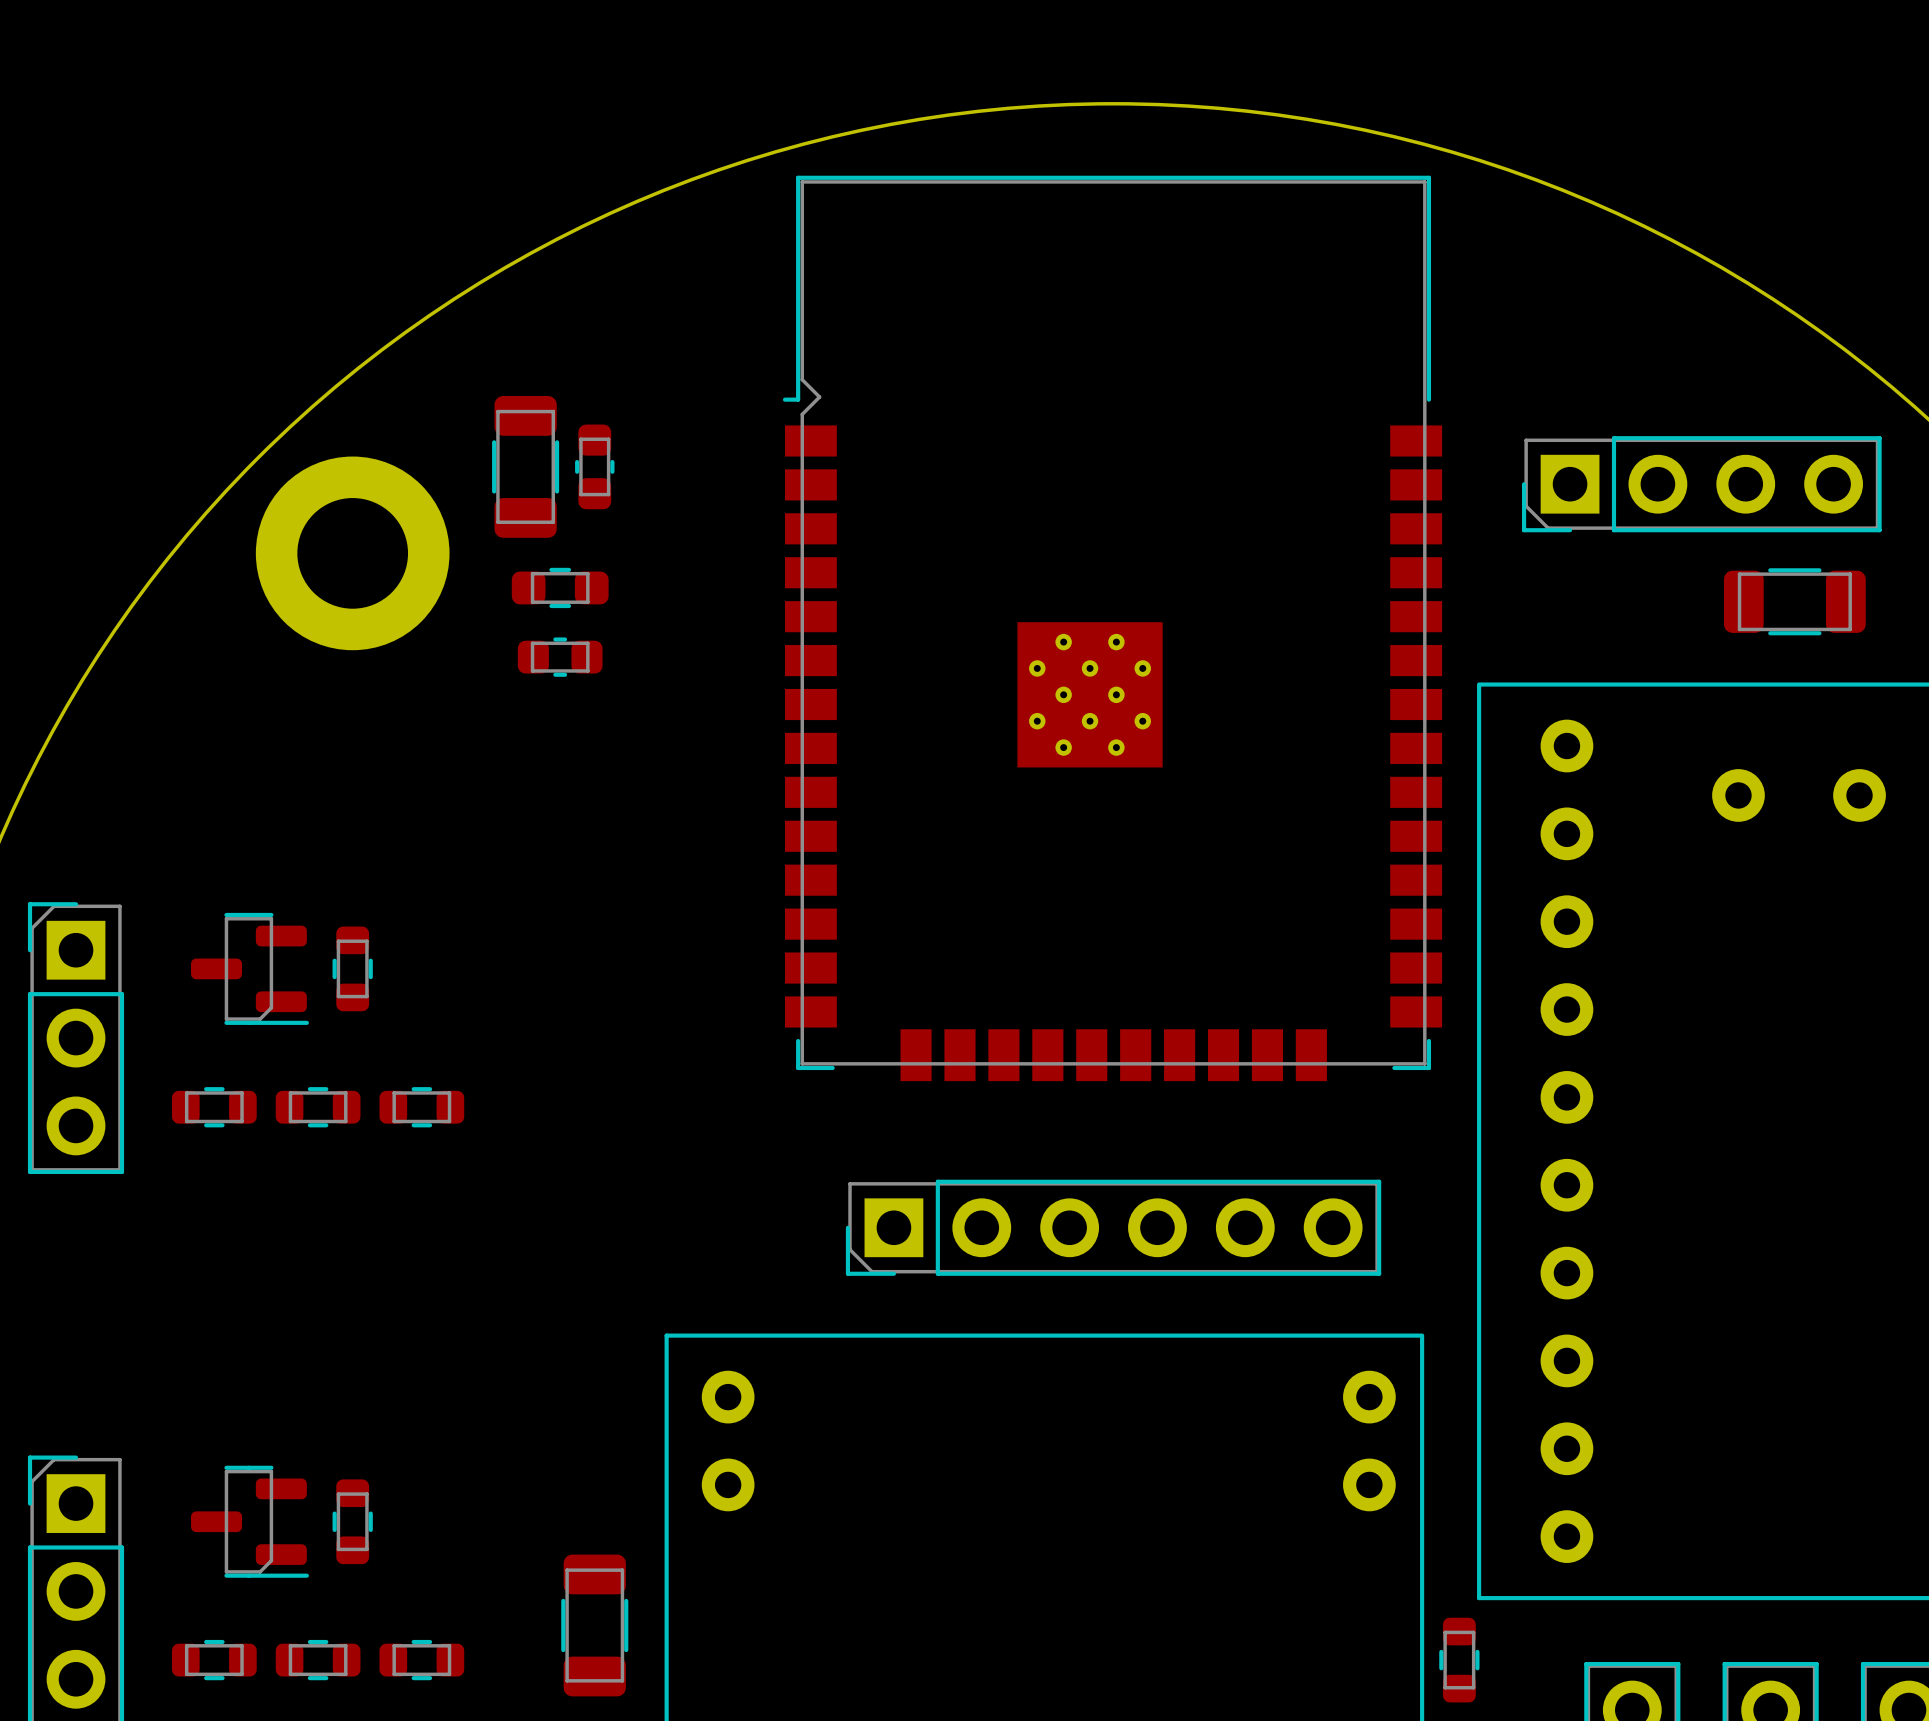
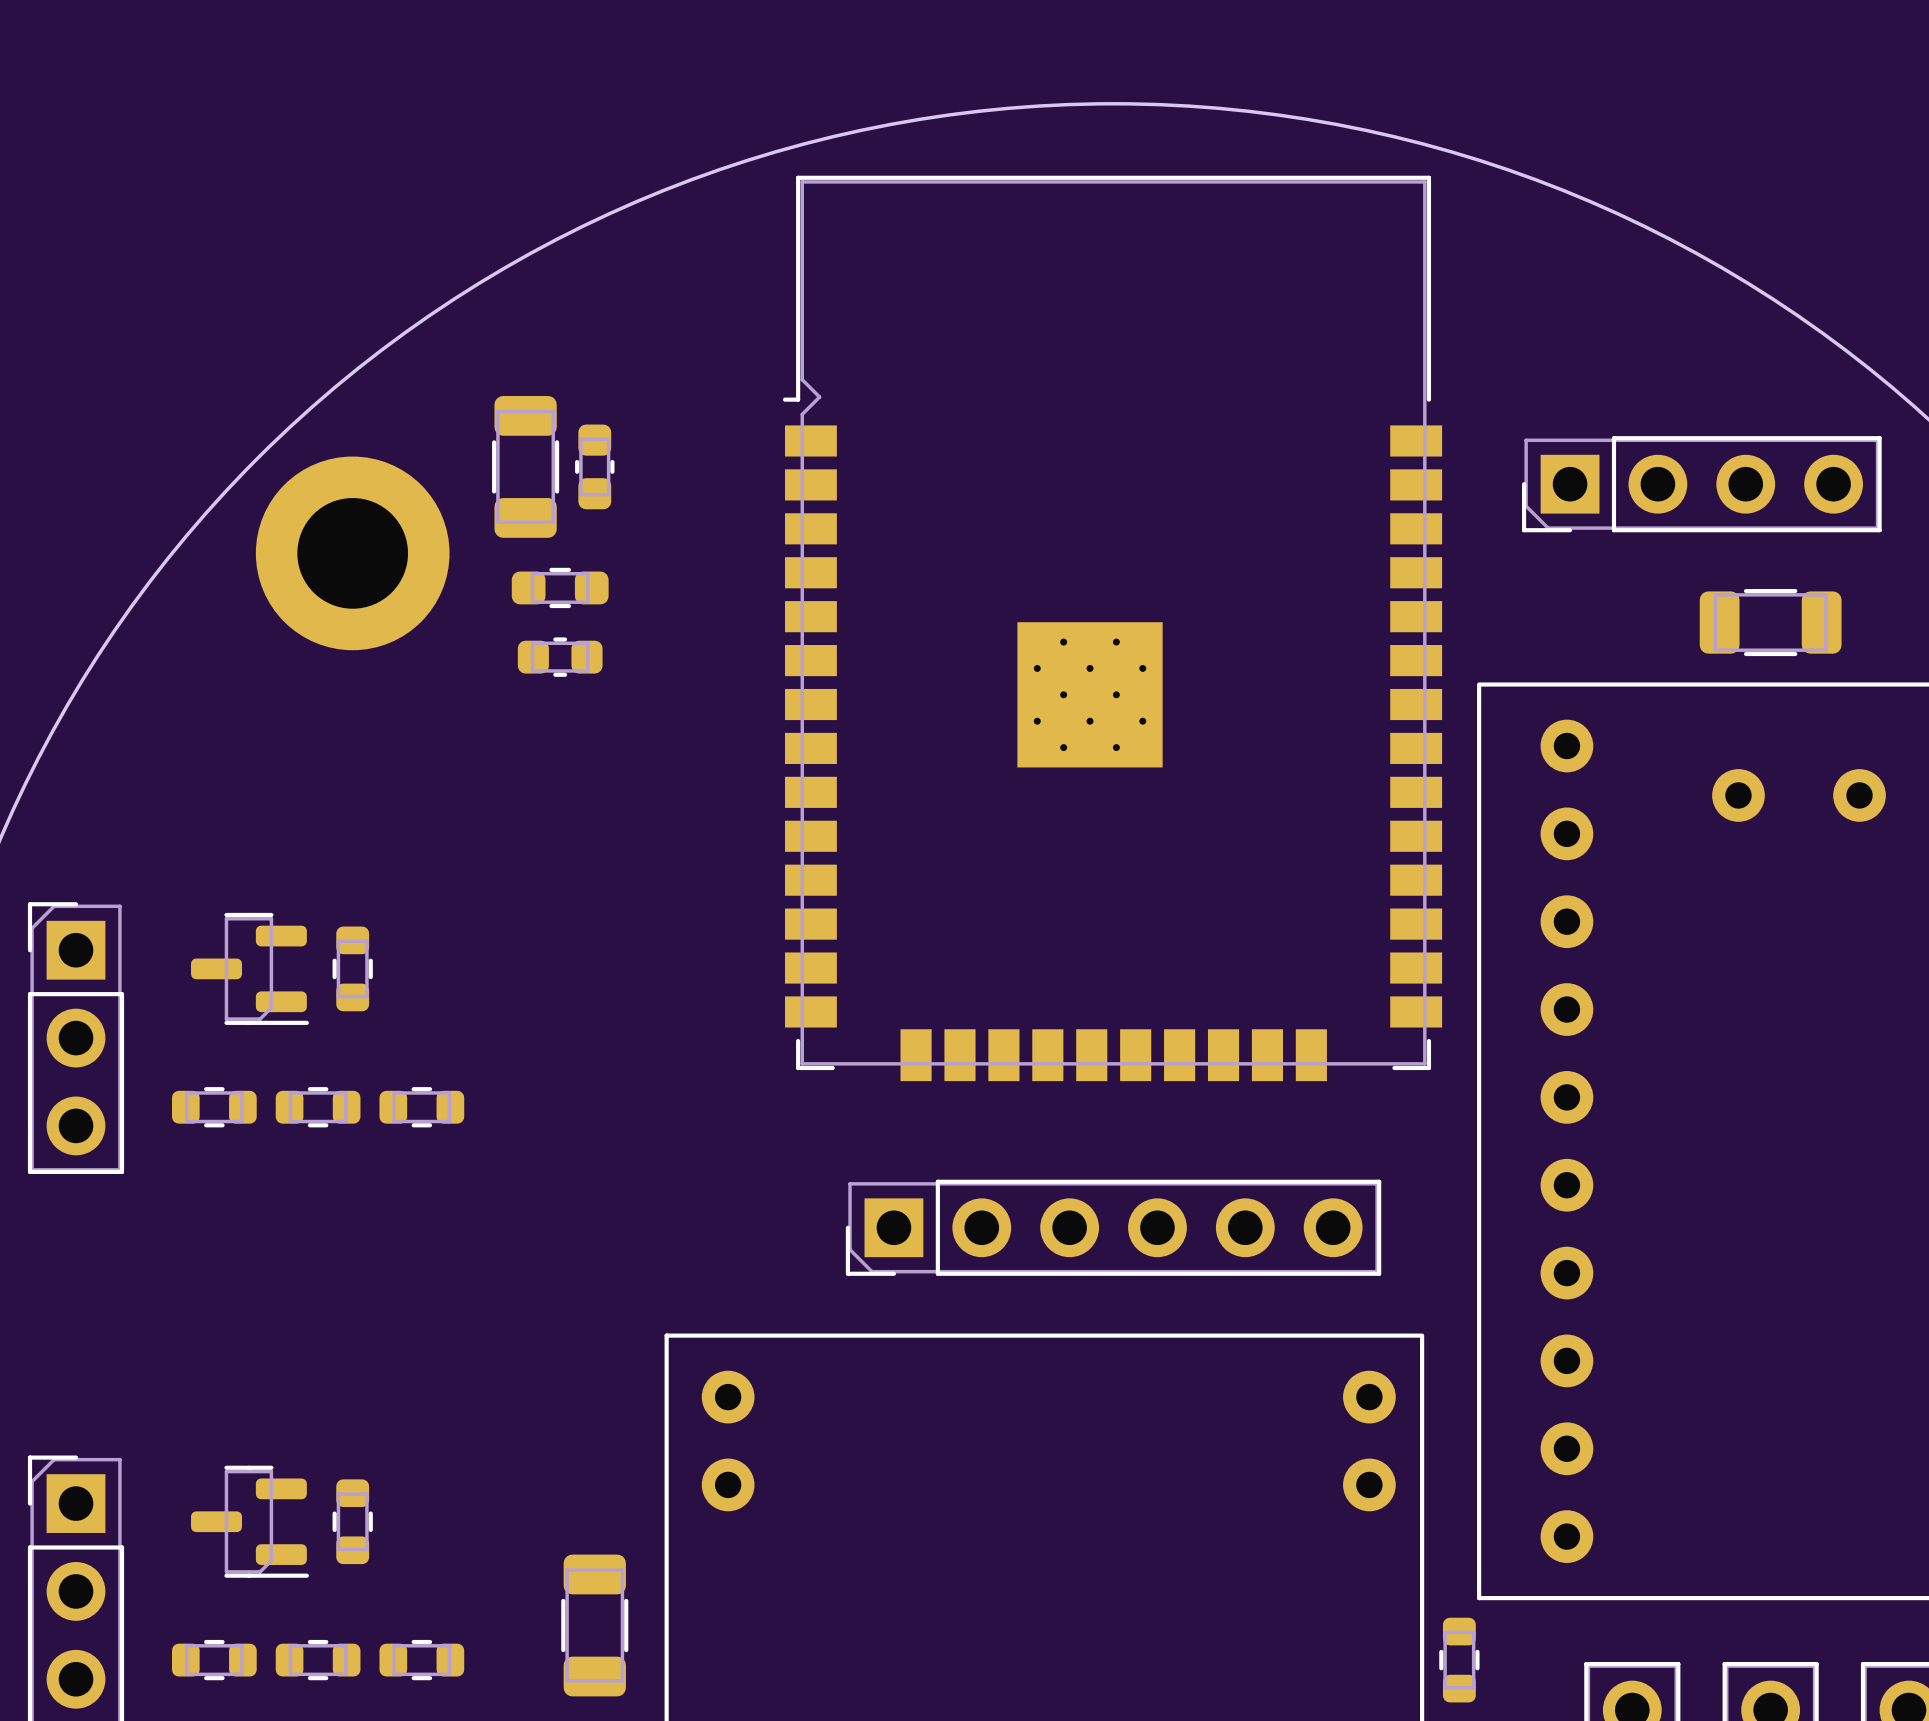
part position: (1794, 601) -> (1770, 622)

